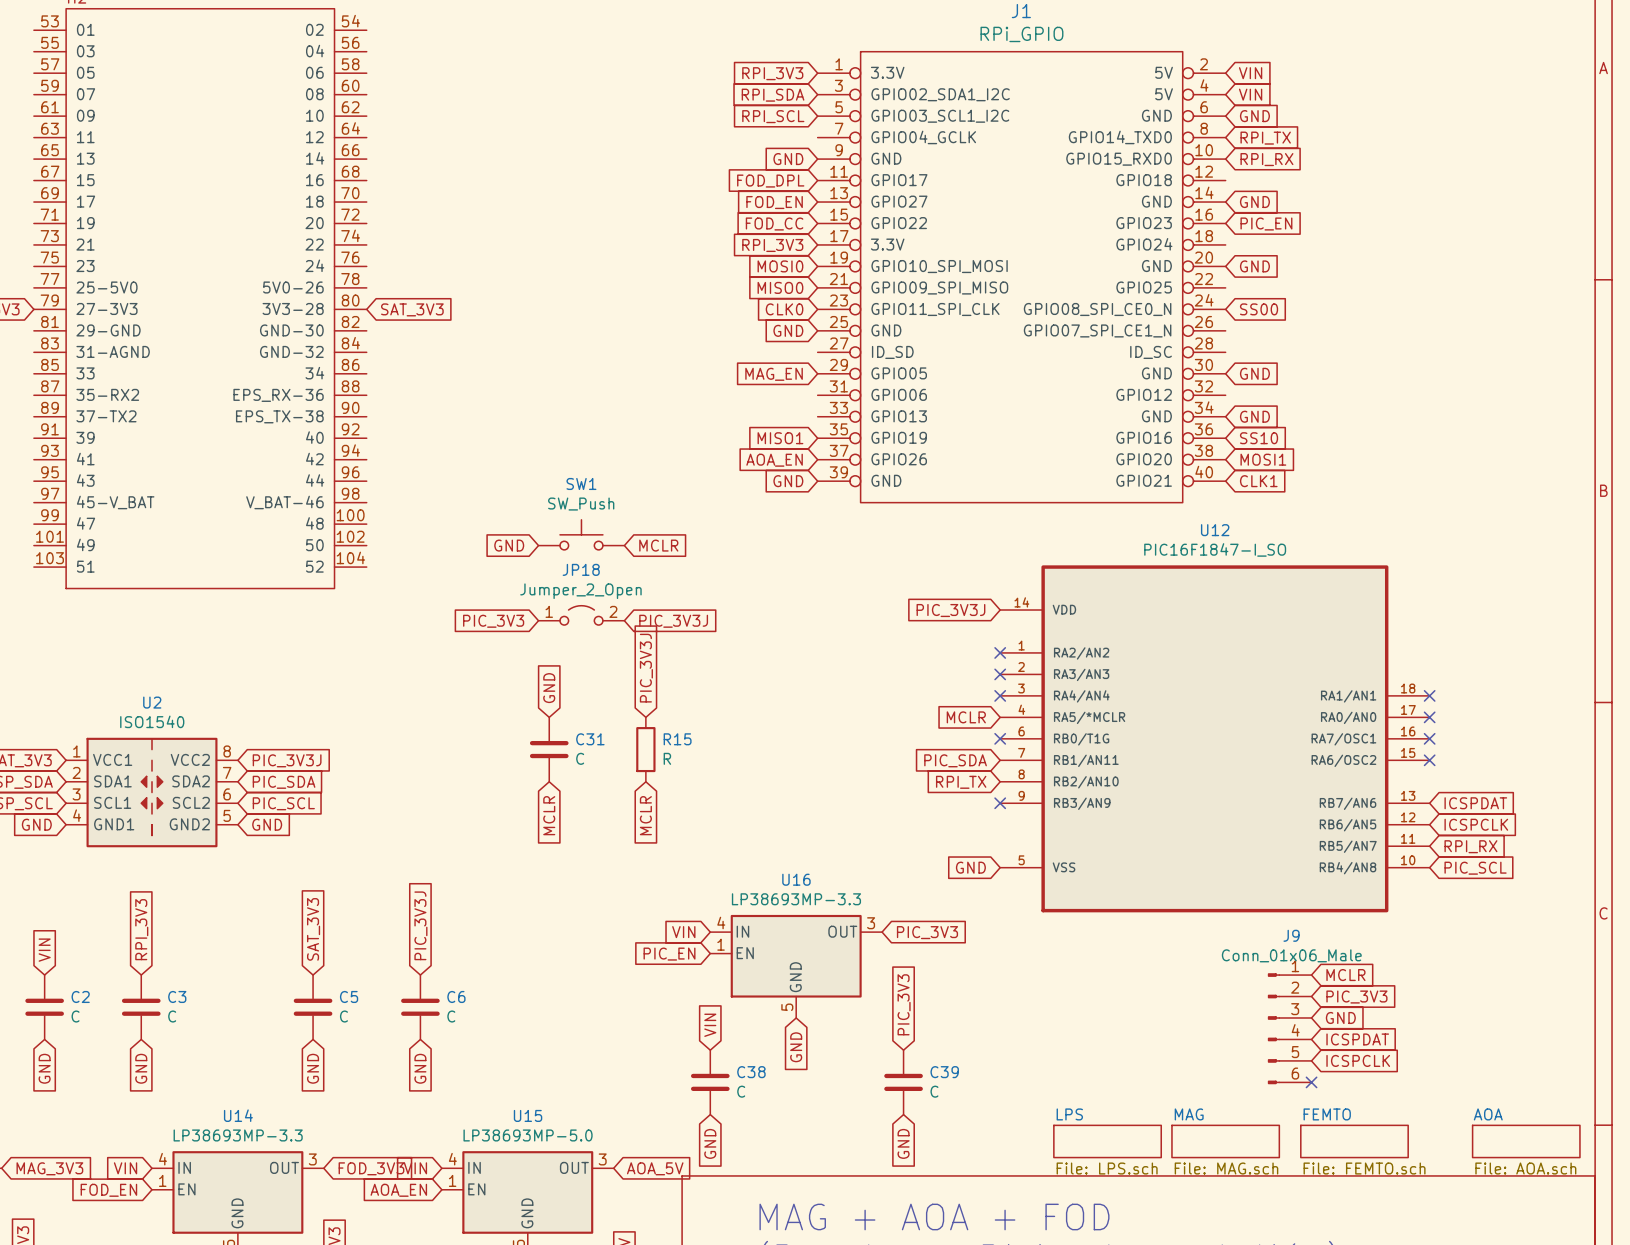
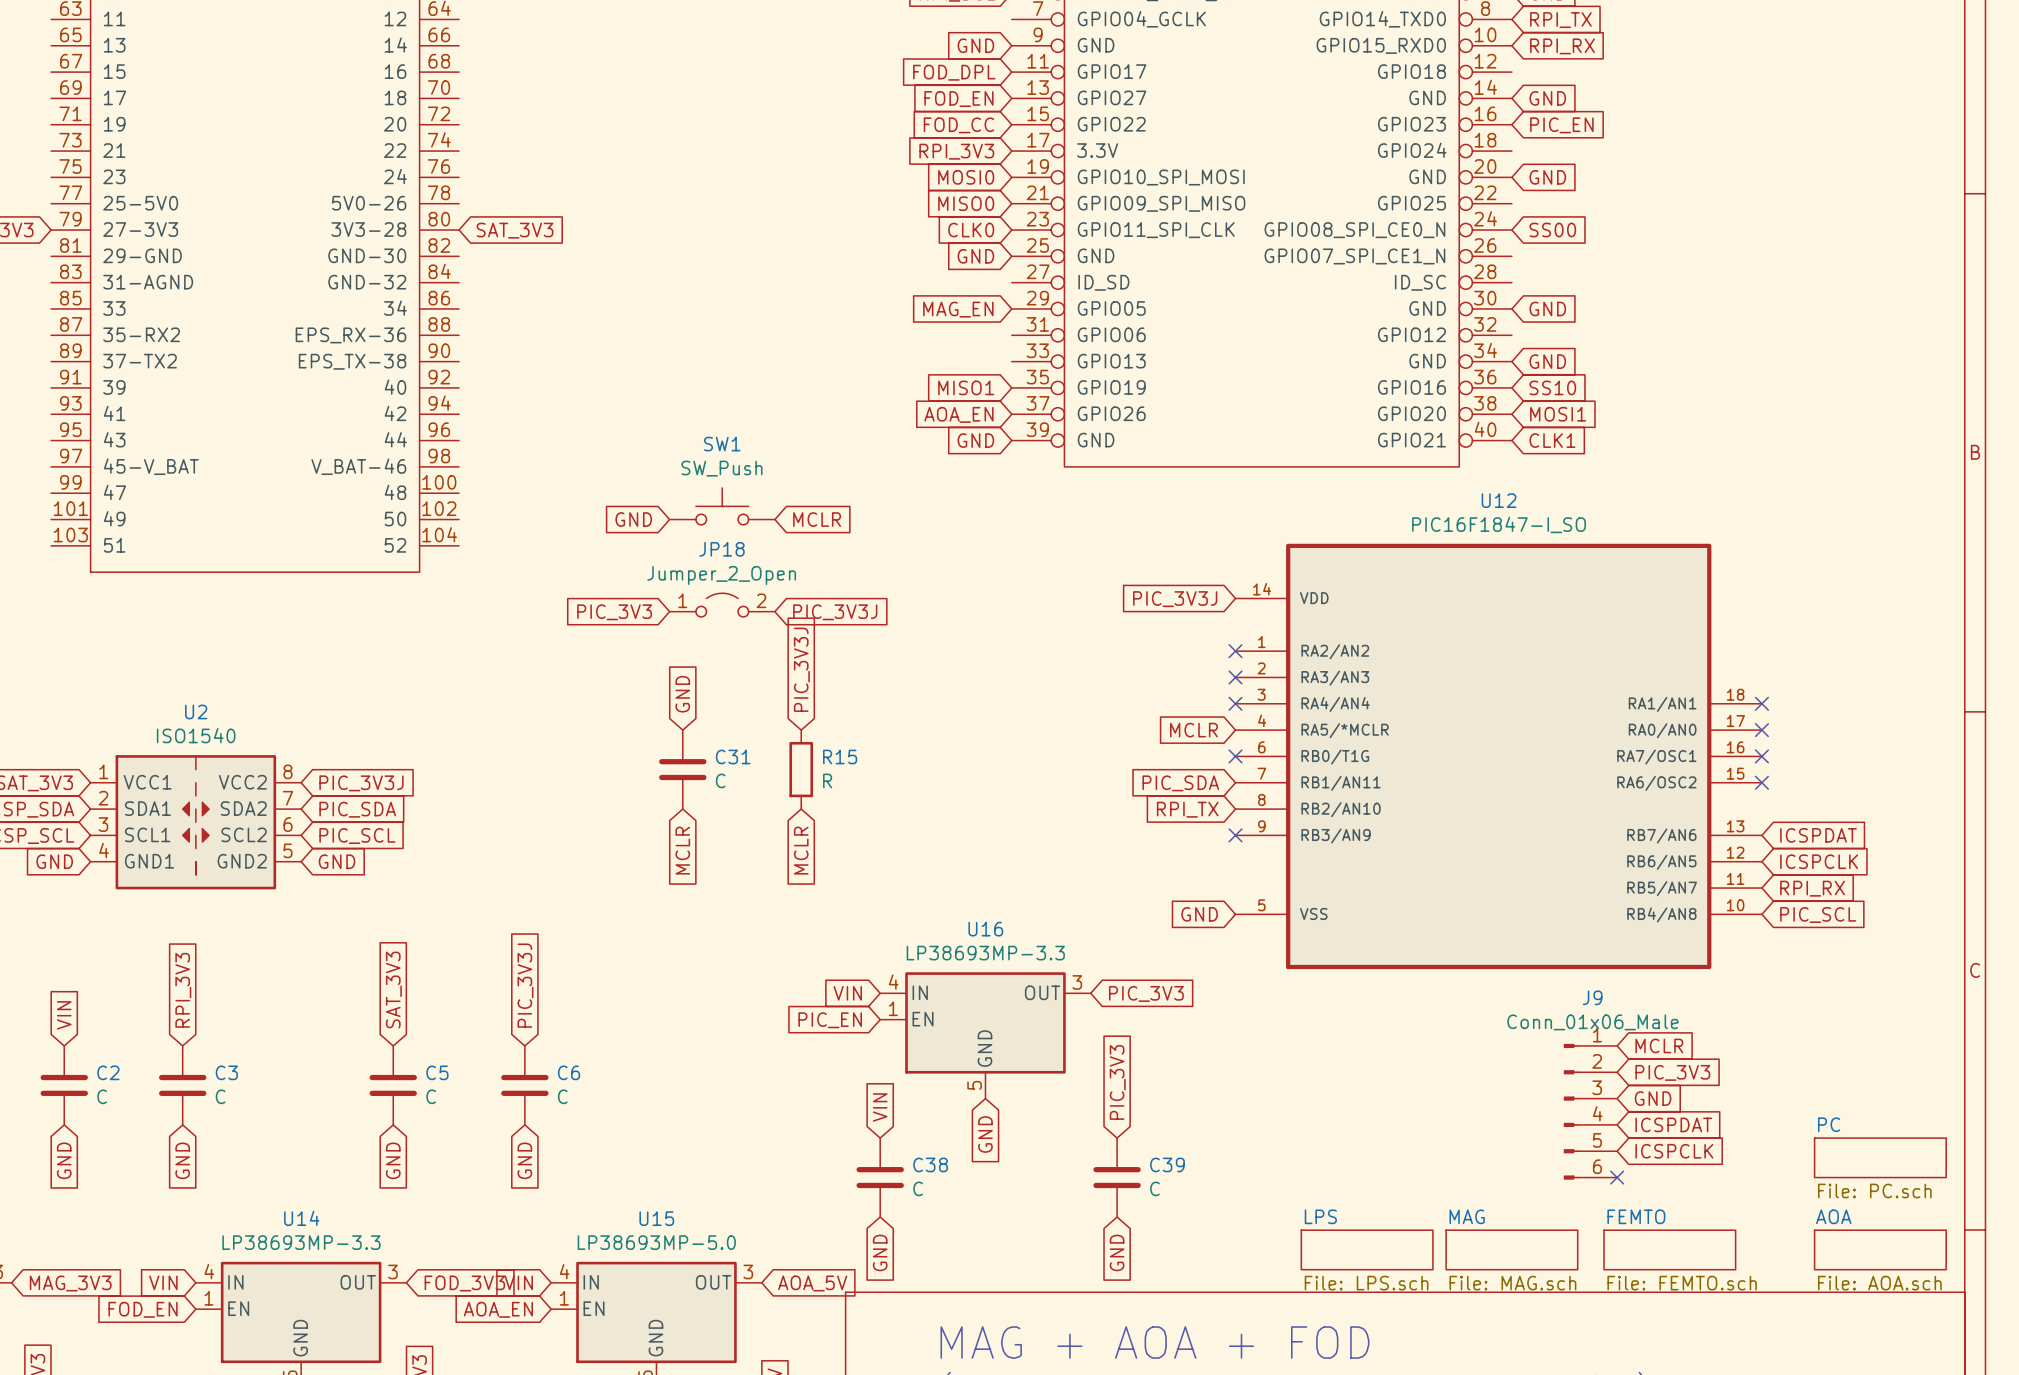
sheet PC: none -> File: PC.sch (1880, 1157)

